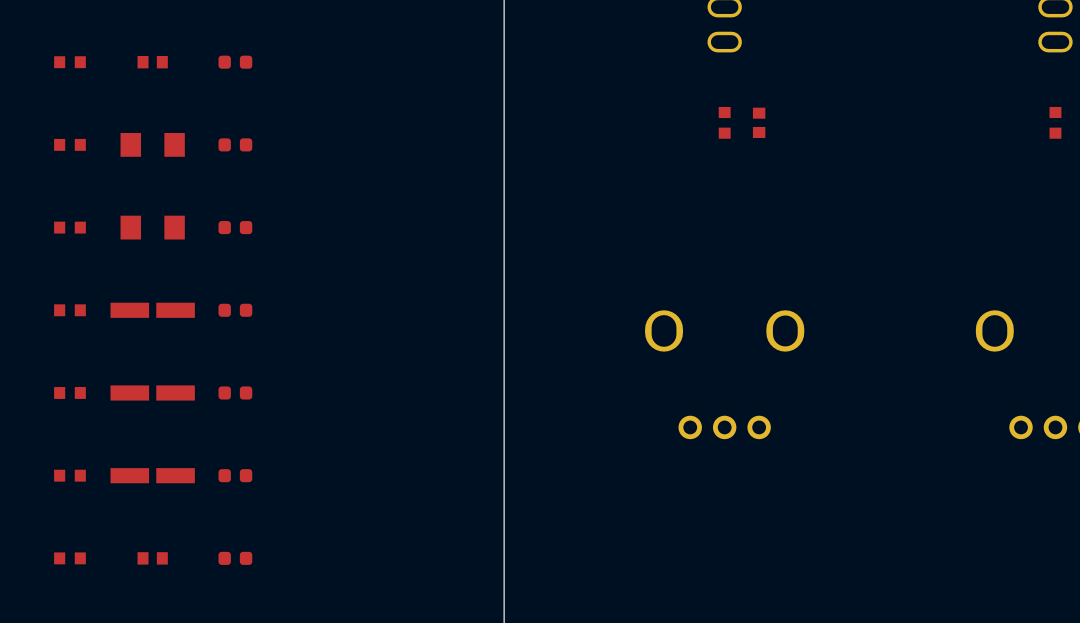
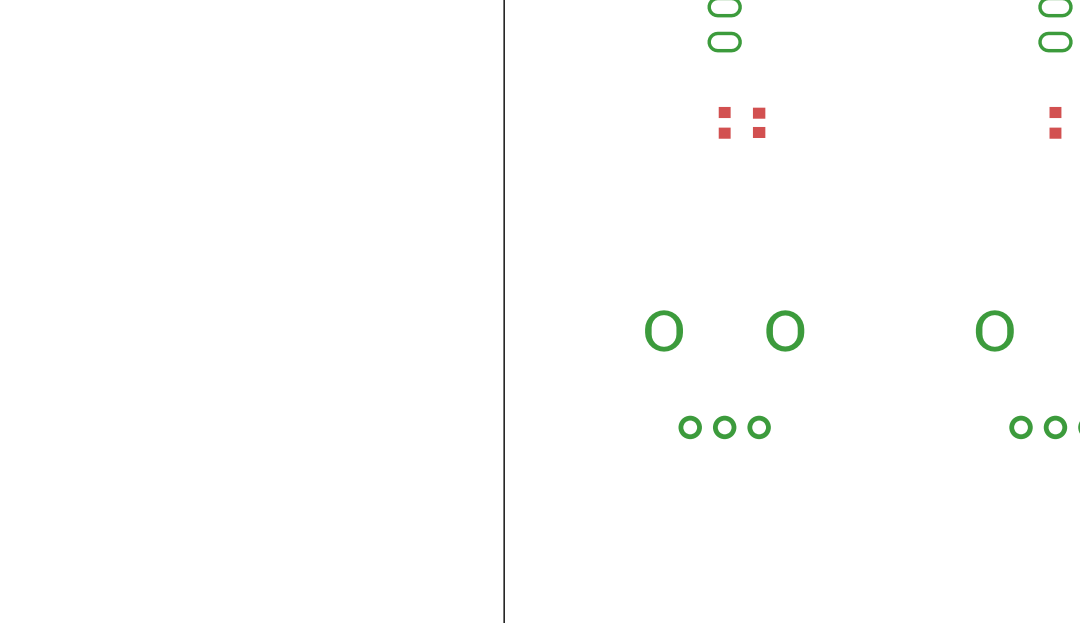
part: (69, 62) -> none
part: (152, 62) -> none
part: (235, 62) -> none
part: (69, 144) -> none
part: (152, 144) -> none
part: (235, 144) -> none
part: (69, 227) -> none
part: (152, 227) -> none
part: (235, 227) -> none
part: (69, 310) -> none
part: (152, 310) -> none
part: (235, 310) -> none
part: (69, 392) -> none
part: (152, 392) -> none
part: (235, 392) -> none
part: (69, 475) -> none
part: (152, 475) -> none
part: (235, 475) -> none
part: (69, 558) -> none
part: (152, 558) -> none
part: (235, 558) -> none

